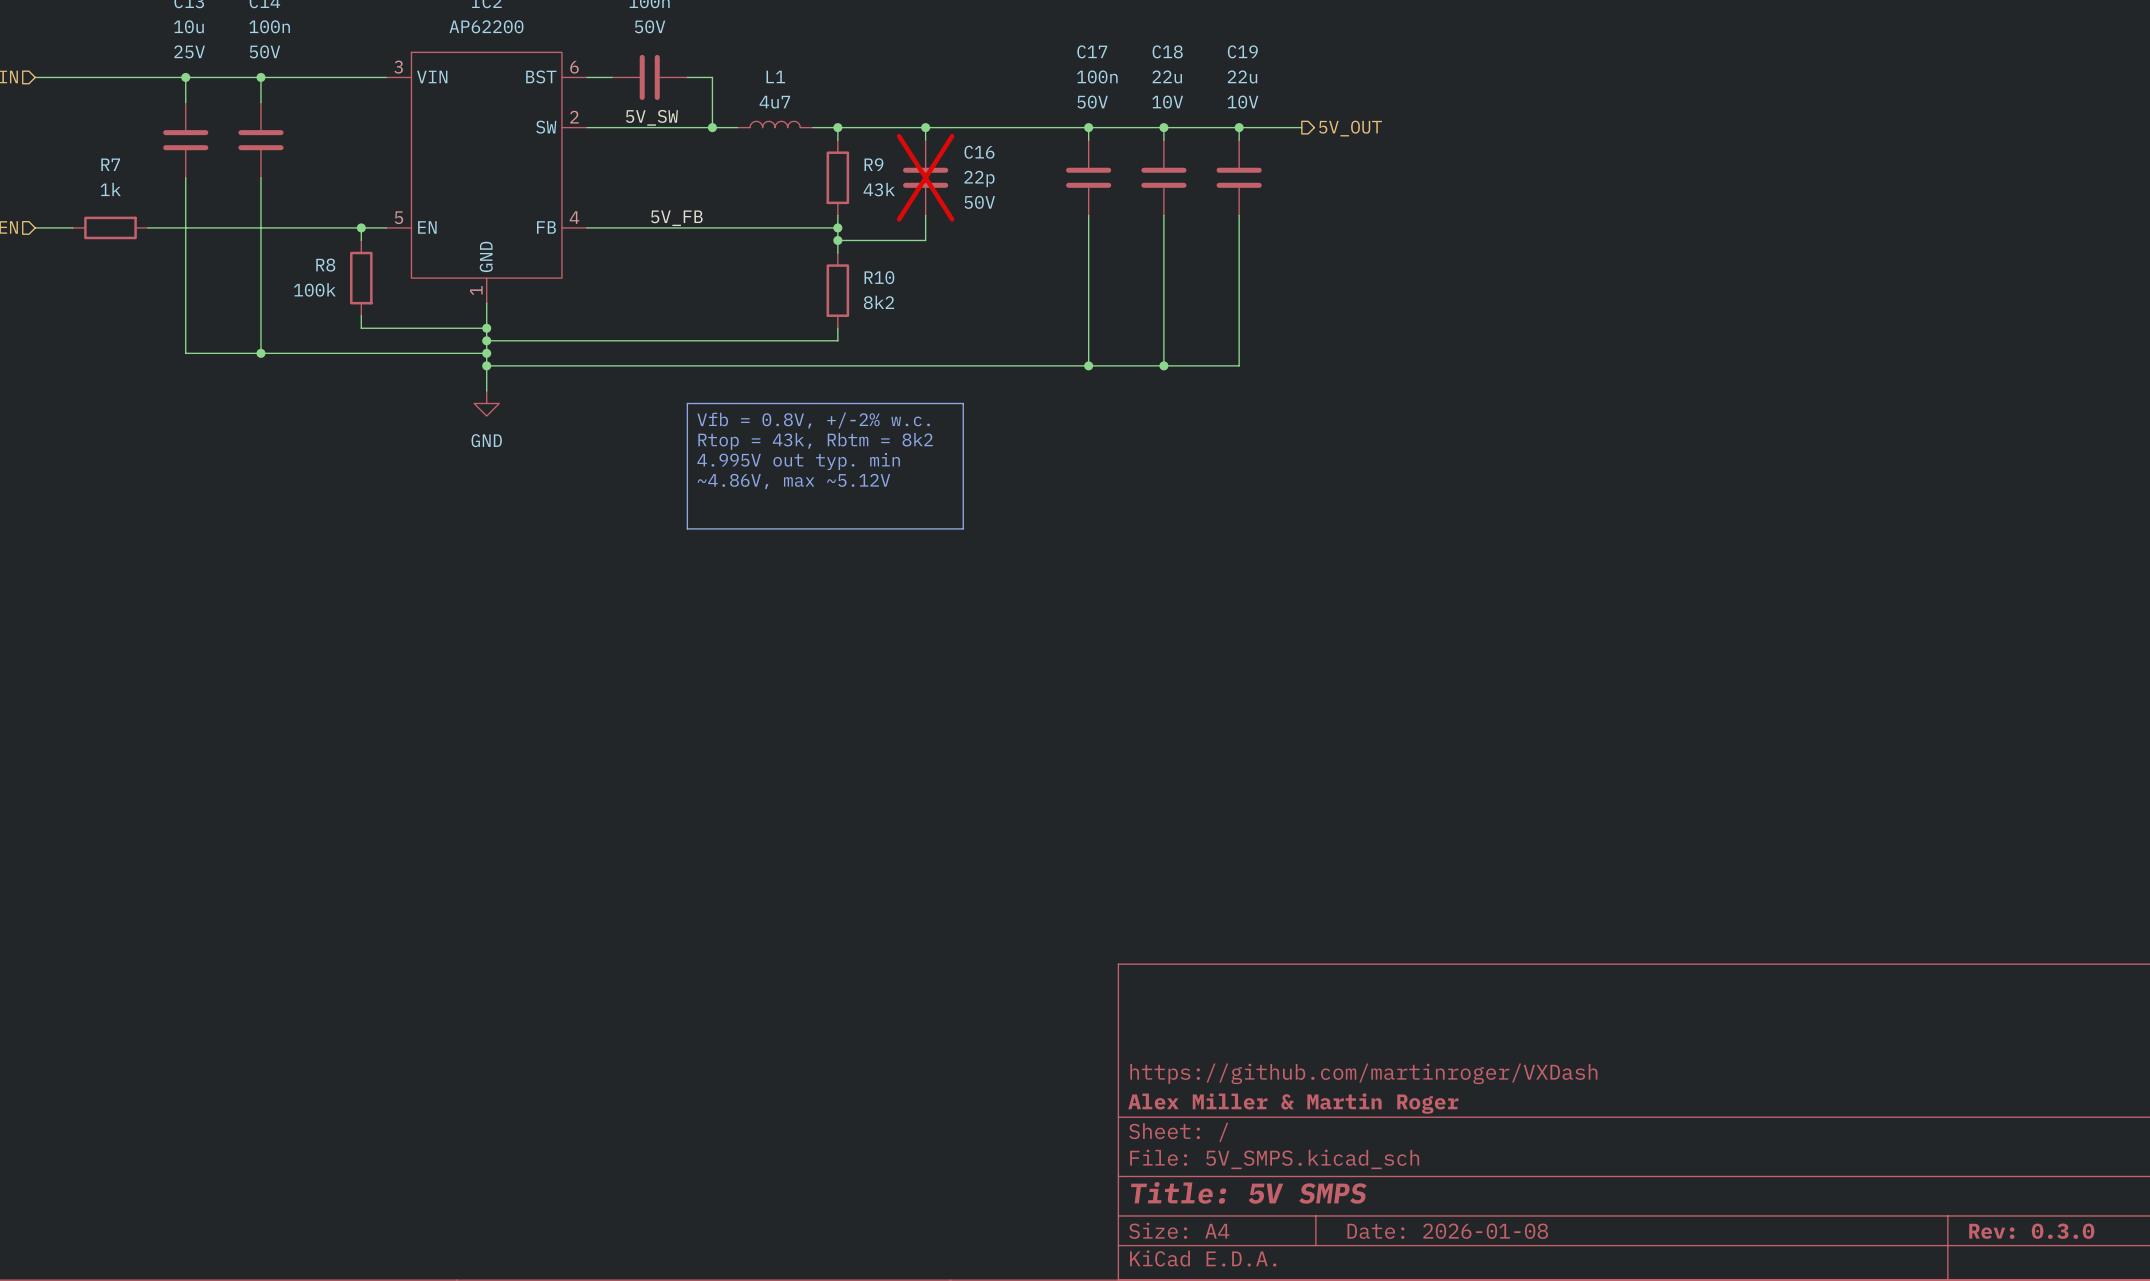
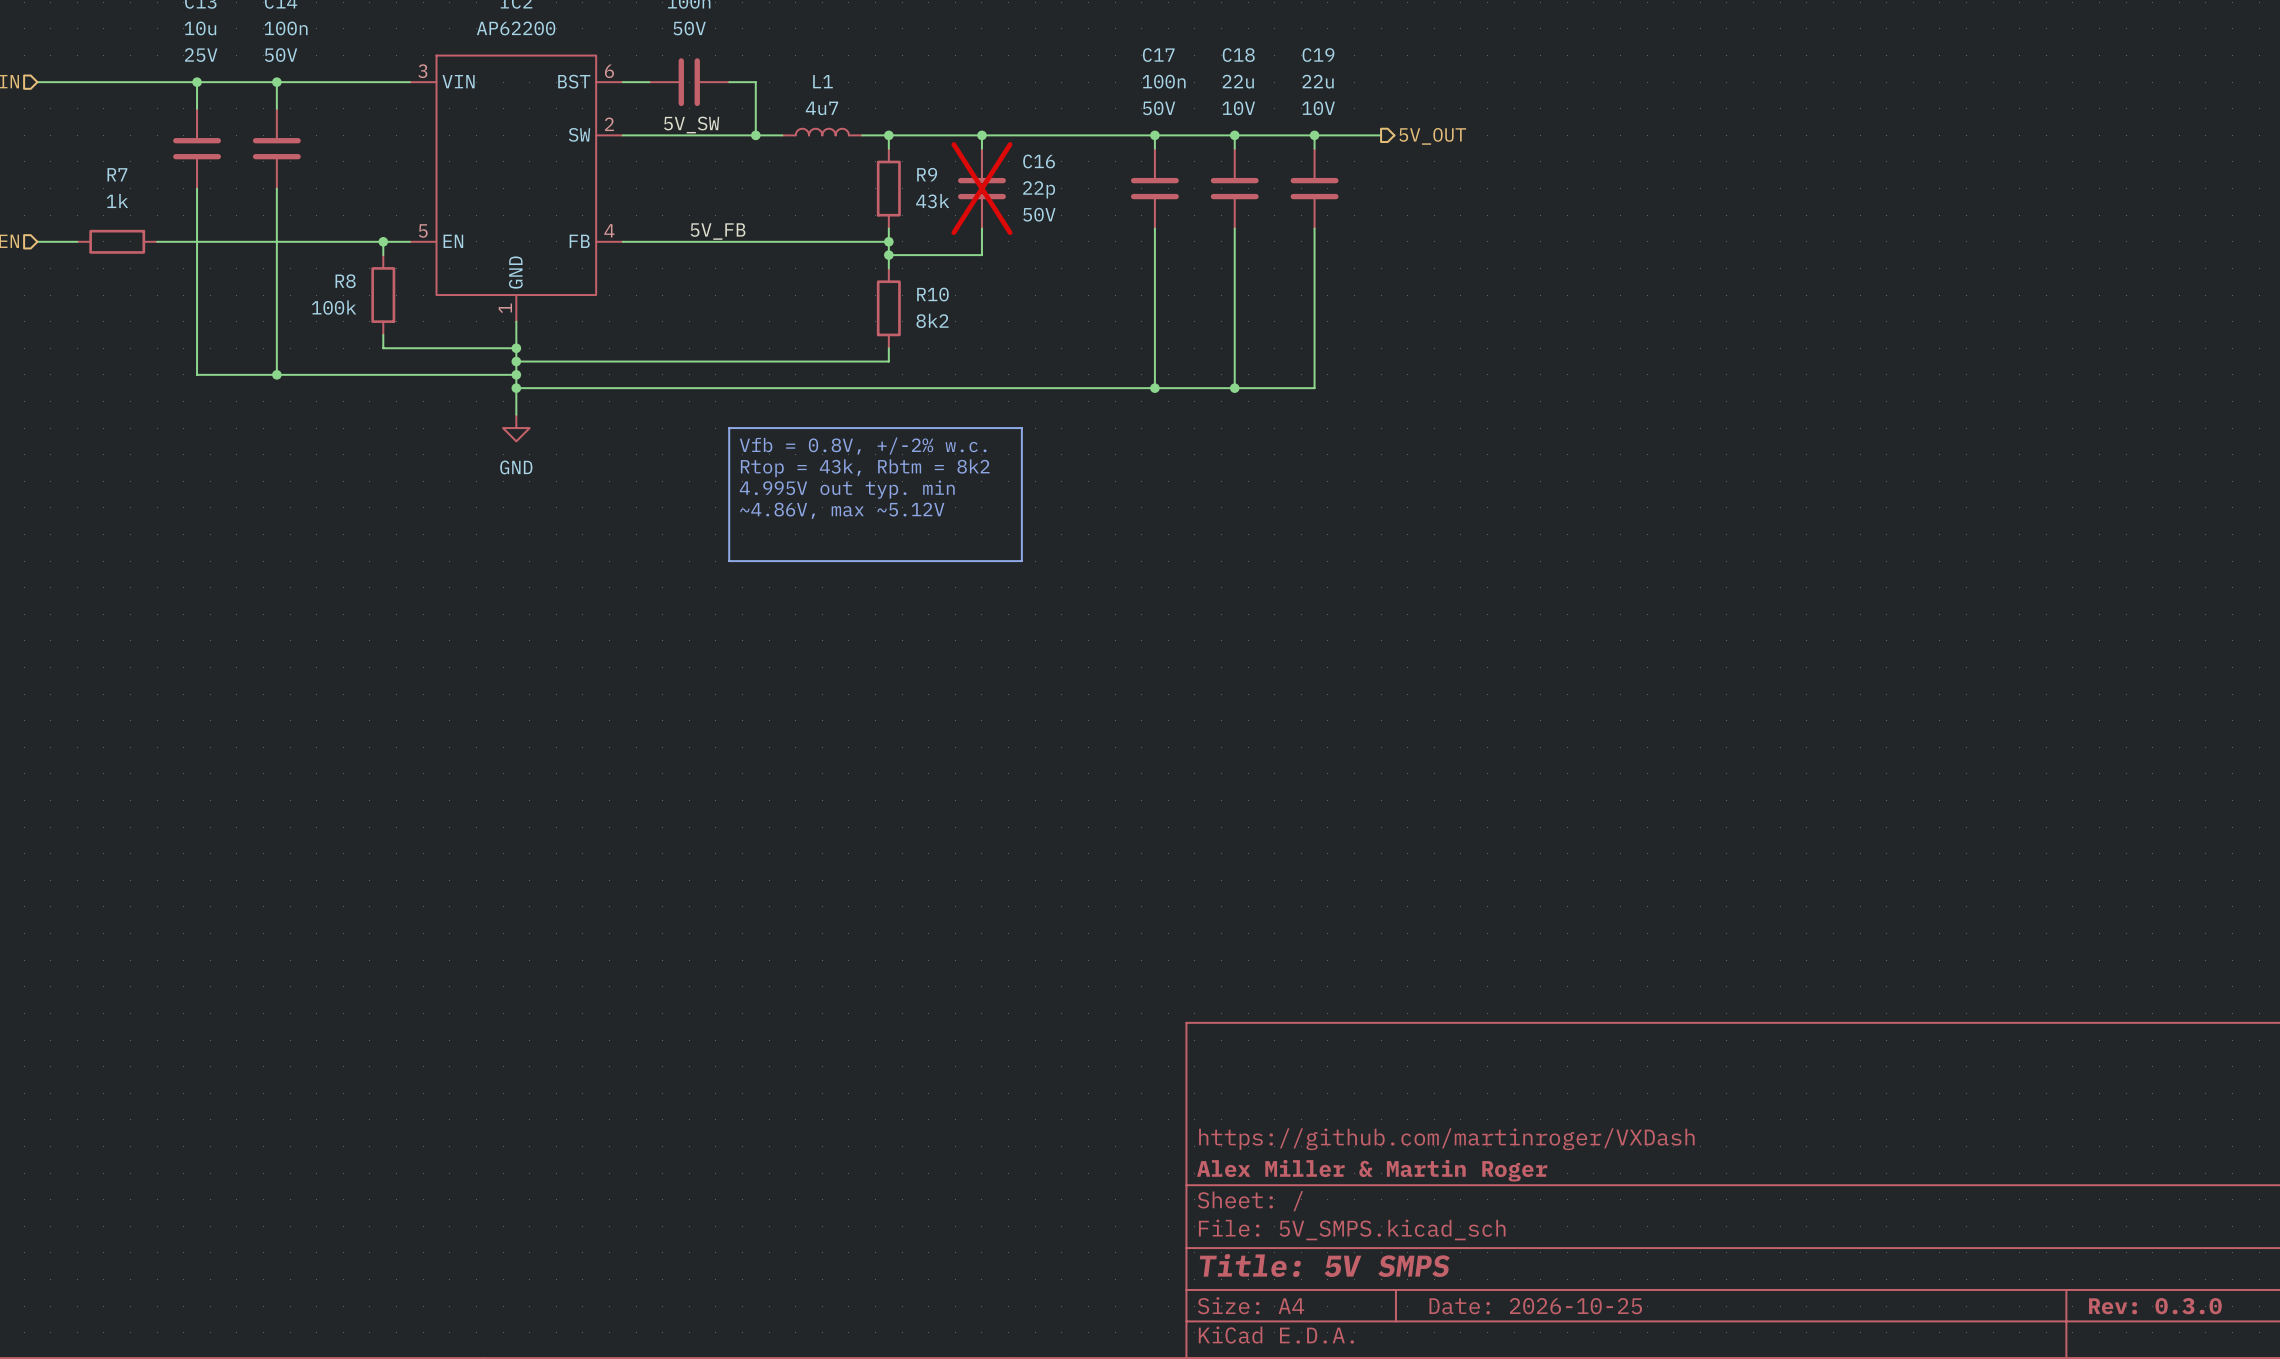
title block: Date: 2026-01-08 (1447, 1231) -> Date: 2026-10-25 (1535, 1306)

